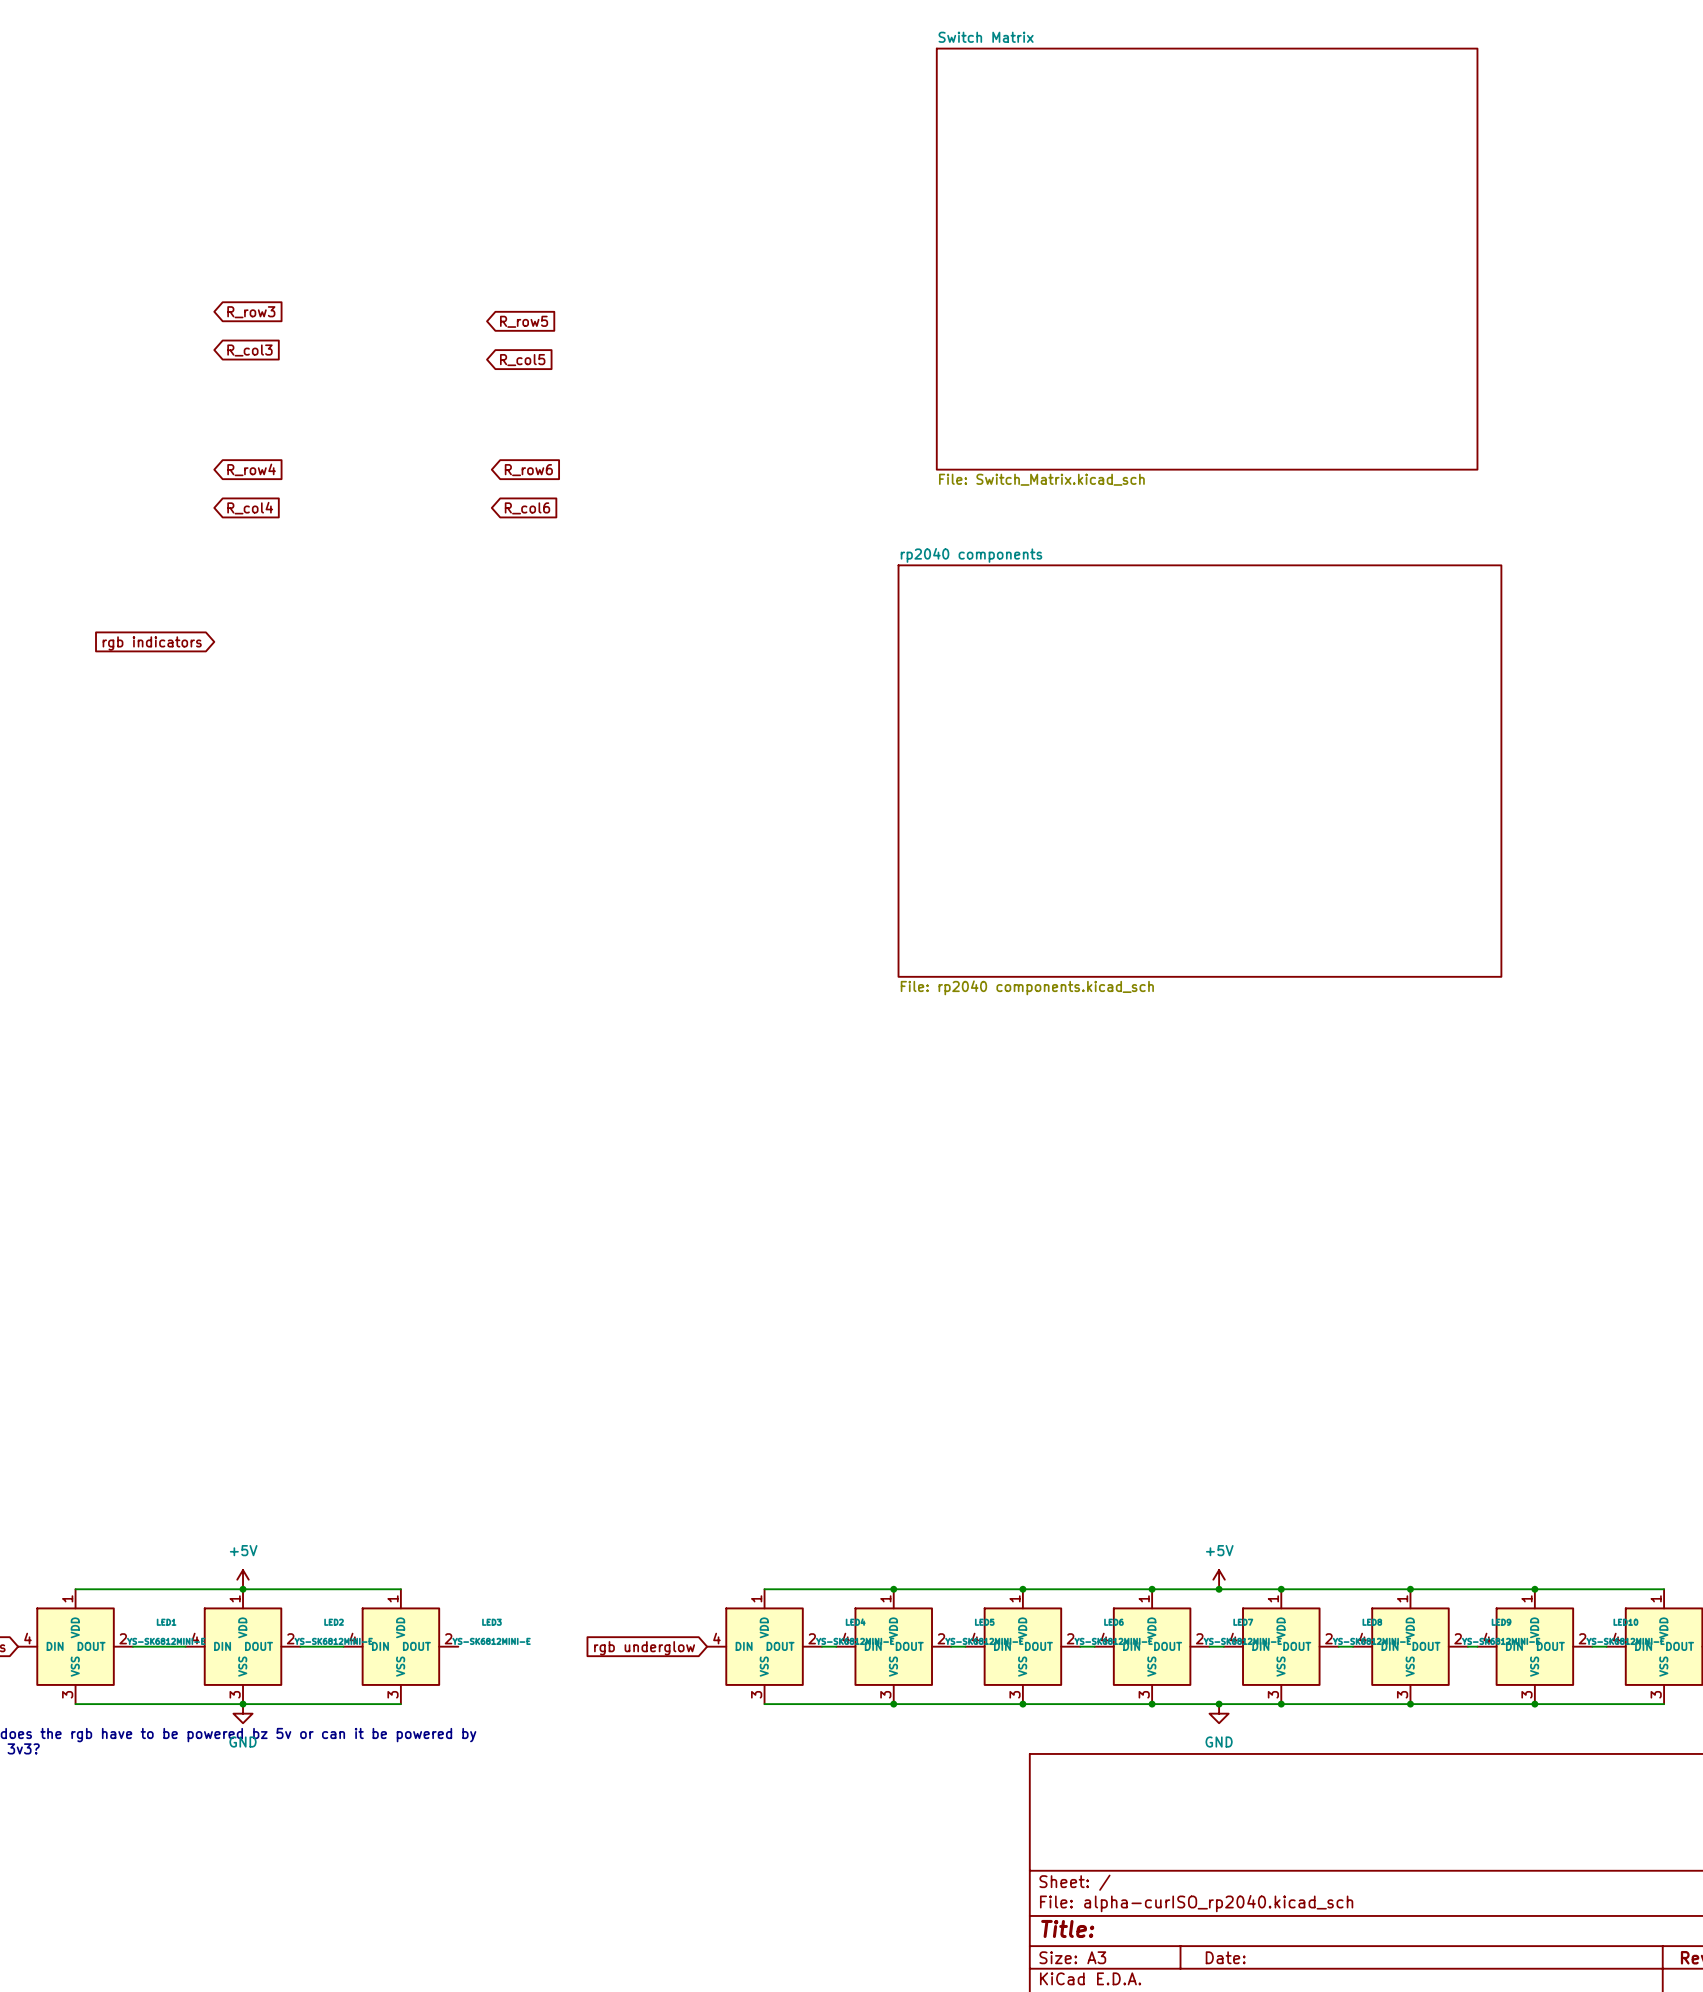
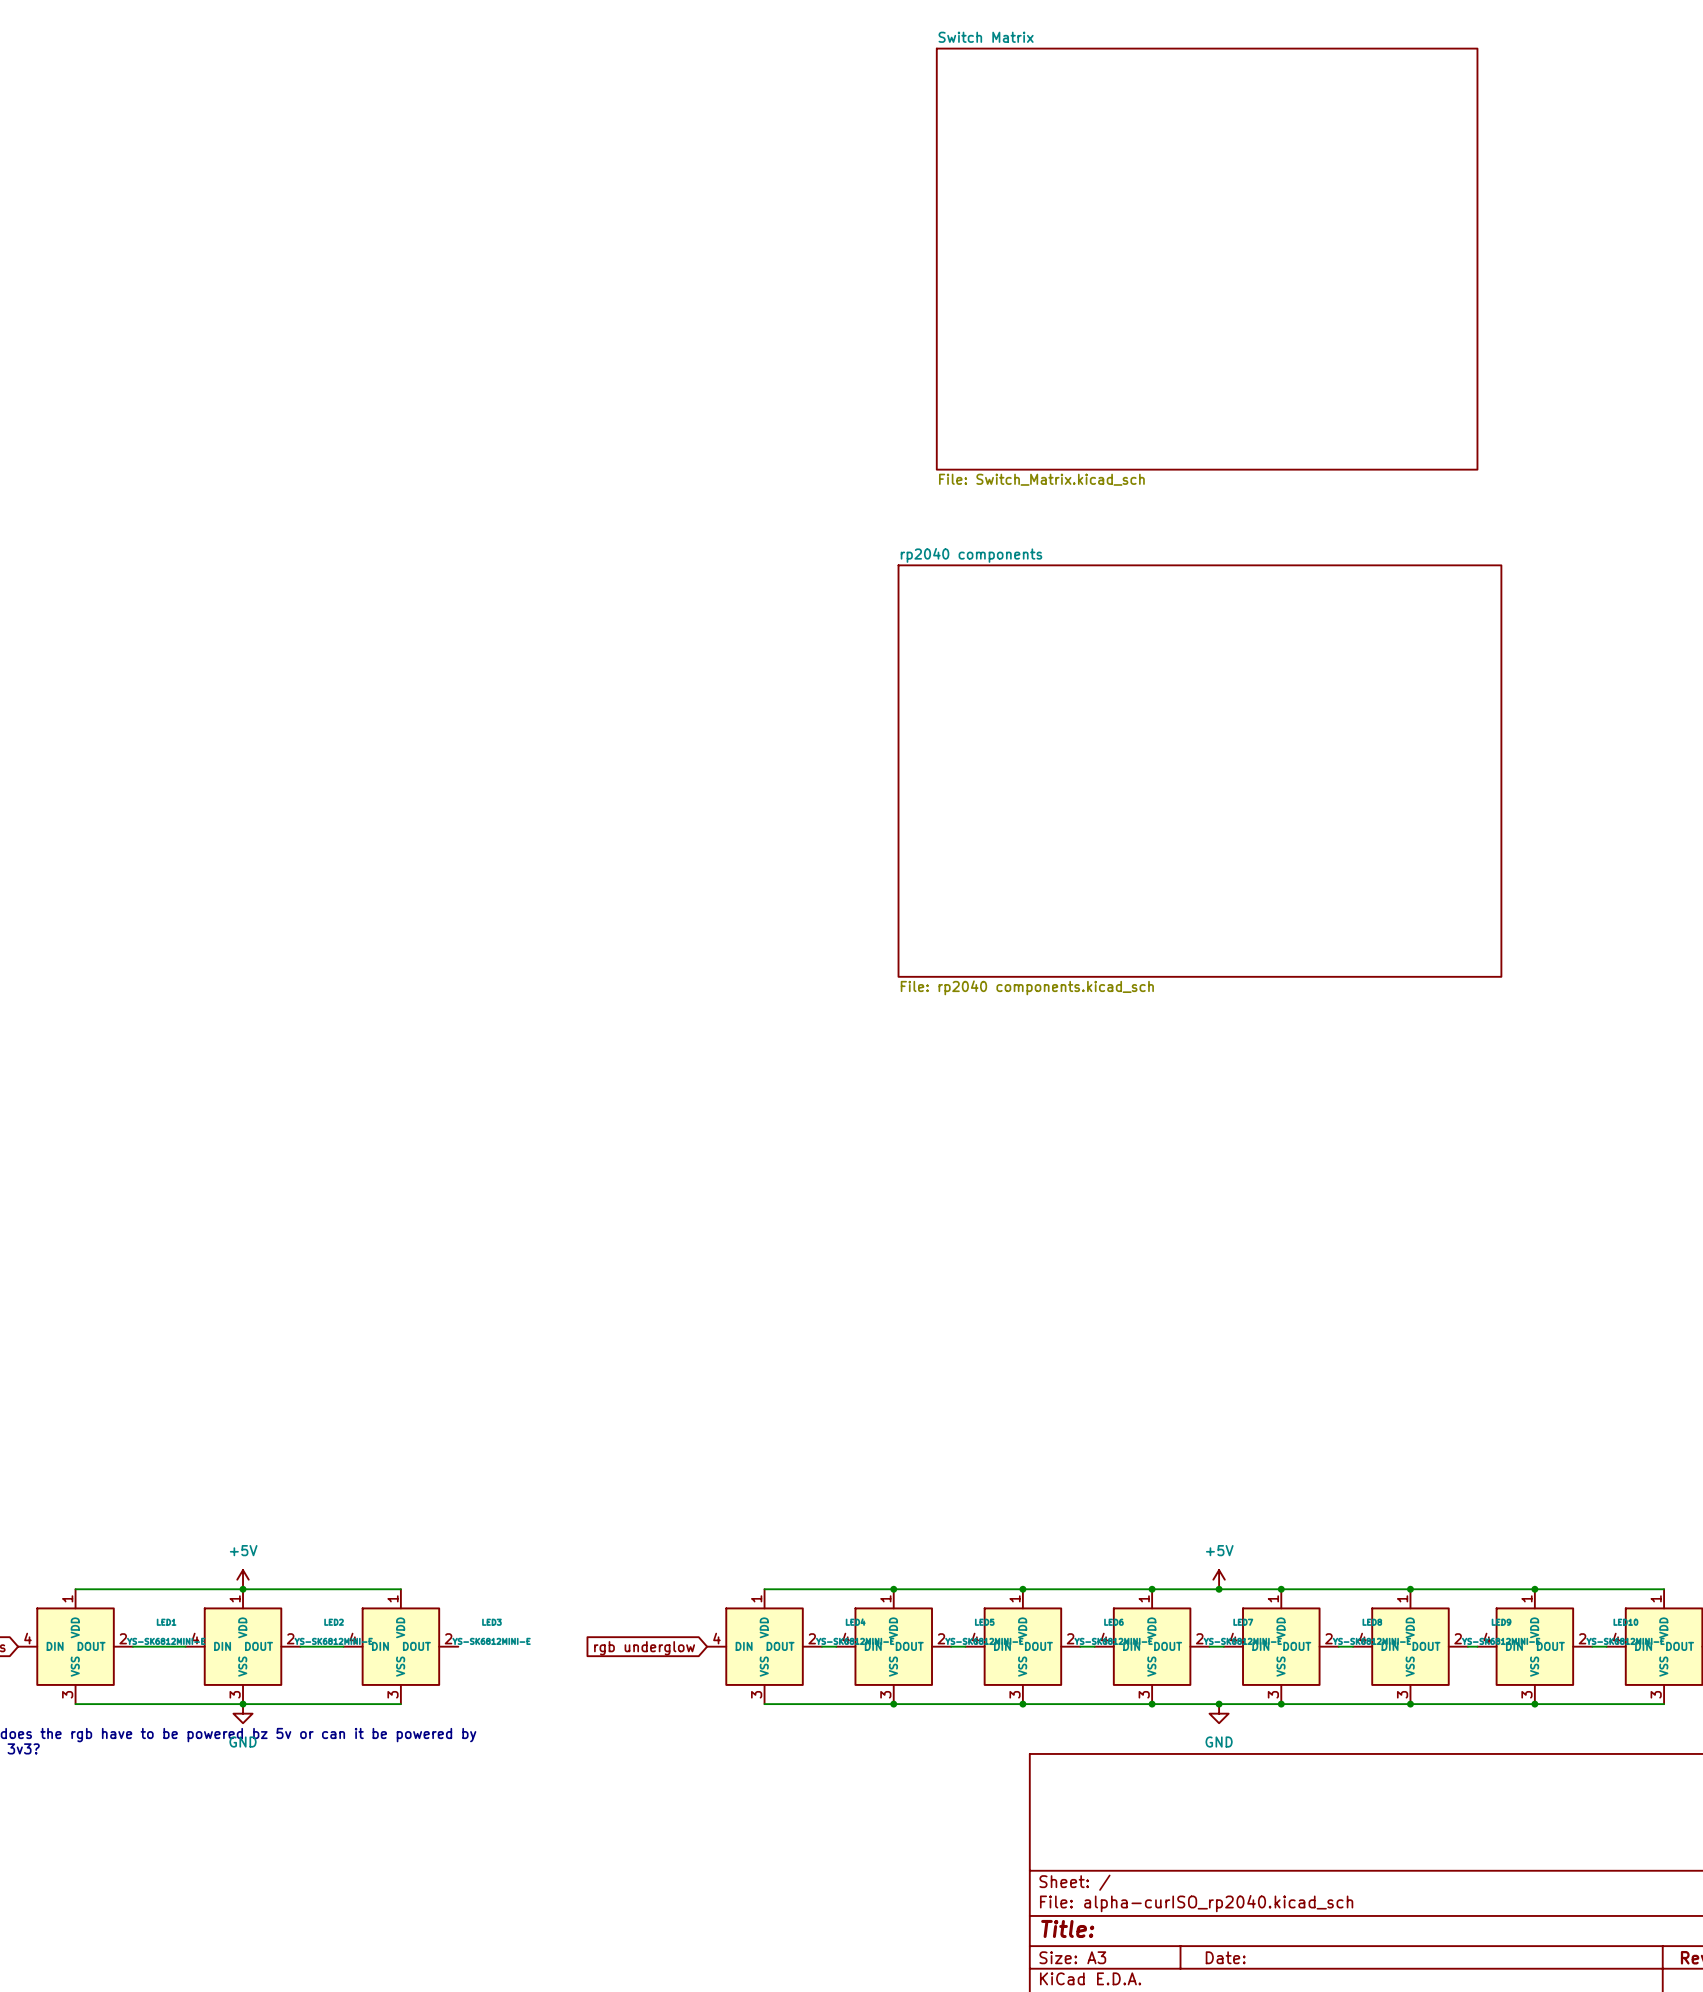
global label: R_row3 (251, 312) -> none
global label: R_row5 (524, 321) -> none
global label: R_col3 (249, 350) -> none
global label: R_col5 (522, 360) -> none
global label: R_row4 (251, 469) -> none
global label: R_row6 (528, 470) -> none
global label: R_col4 (250, 508) -> none
global label: R_col6 (527, 508) -> none
global label: rgb indicators (152, 643) -> none

